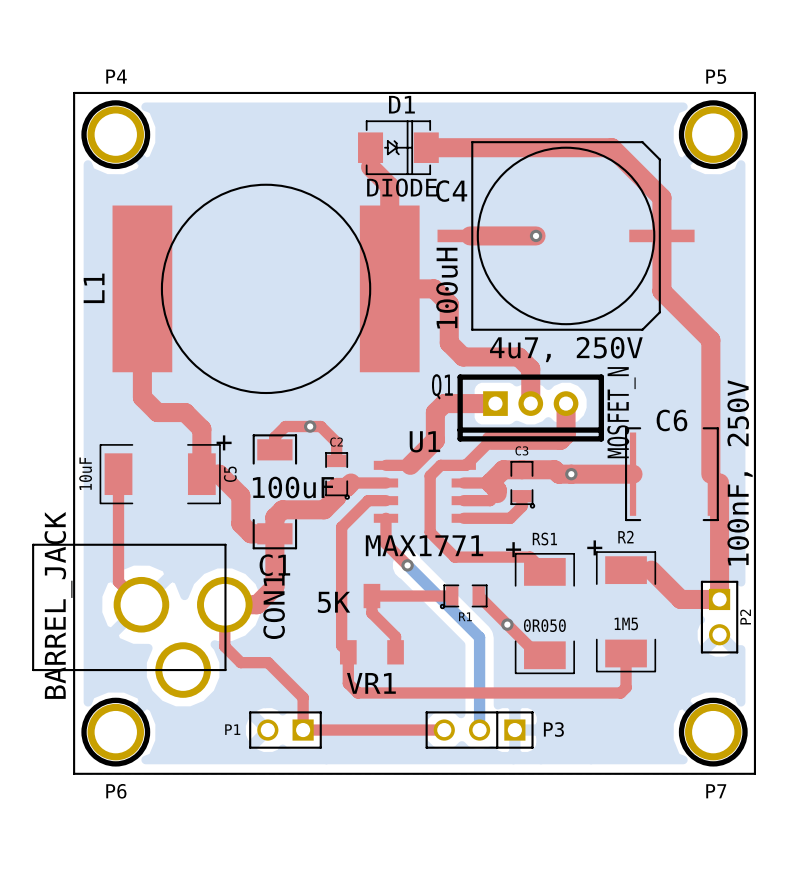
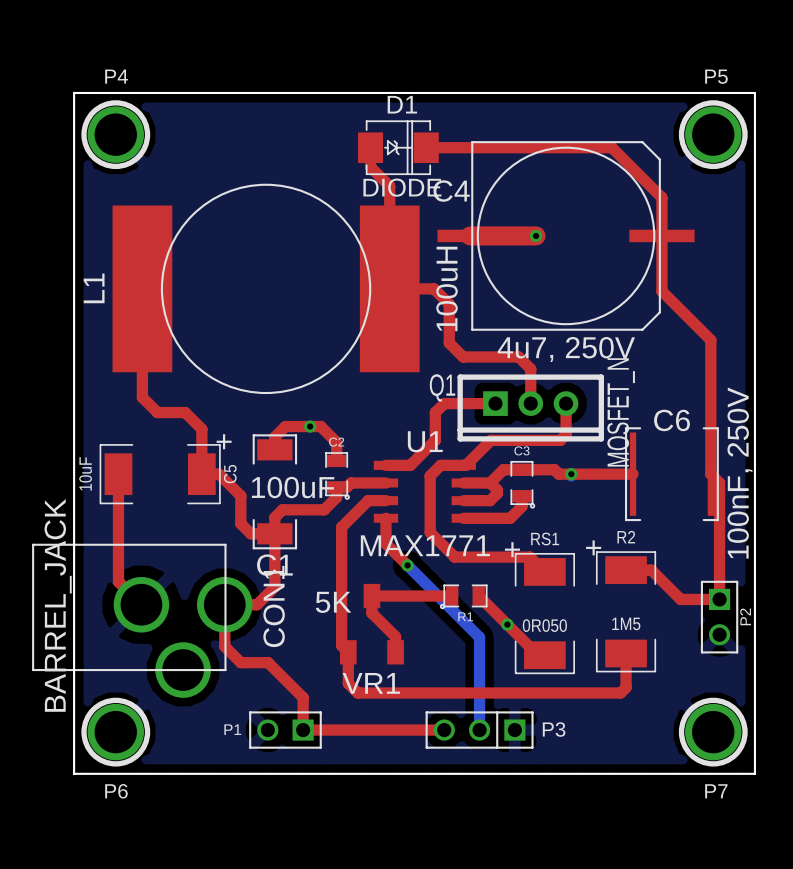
top track width: thick (426, 147) (611, 147) (661, 197) (661, 291) (710, 340) (710, 474) -> thin (426, 147) (611, 147) (661, 197) (661, 291) (710, 340) (710, 474)
top track width: thick (370, 167) (389, 186) (389, 288) (433, 288) (449, 304) (449, 343) (463, 356) (518, 356) (530, 368) (530, 403) -> thin (370, 167) (389, 186) (389, 288) (433, 288) (449, 304) (449, 343) (463, 356) (518, 356) (530, 368) (530, 403)
top track width: thick (142, 288) (142, 397) (157, 412) (185, 412) (201, 429) (201, 474) (219, 474) (240, 495) (240, 523) (250, 533) (274, 533) -> thin (142, 288) (142, 397) (157, 412) (185, 412) (201, 429) (201, 474) (219, 474) (240, 495) (240, 523) (250, 533) (274, 533)
top track width: thick (495, 403) (444, 403) (435, 412) (435, 440) (410, 465) -> thin (495, 403) (444, 403) (435, 412) (435, 440) (410, 465)
top track width: thick (566, 403) (566, 434) (560, 440) (490, 440) -> thin (566, 403) (566, 434) (560, 440) (490, 440)
top track width: thick (633, 474) (558, 474) (554, 469) (503, 469) (490, 483) (497, 490) (497, 493) -> thin (633, 474) (558, 474) (554, 469) (503, 469) (490, 483) (497, 490) (497, 493)
top track width: thick (719, 482) (719, 599) (680, 599) (651, 570) -> thin (719, 482) (719, 599) (680, 599) (651, 570)
top track width: thick (351, 483) (346, 487) (336, 487) (336, 497) (324, 509) (282, 509) (274, 517) (274, 586) (257, 604) (224, 604) -> thin (351, 483) (346, 487) (336, 487) (336, 497) (324, 509) (282, 509) (274, 517) (274, 586) (257, 604) (224, 604)

